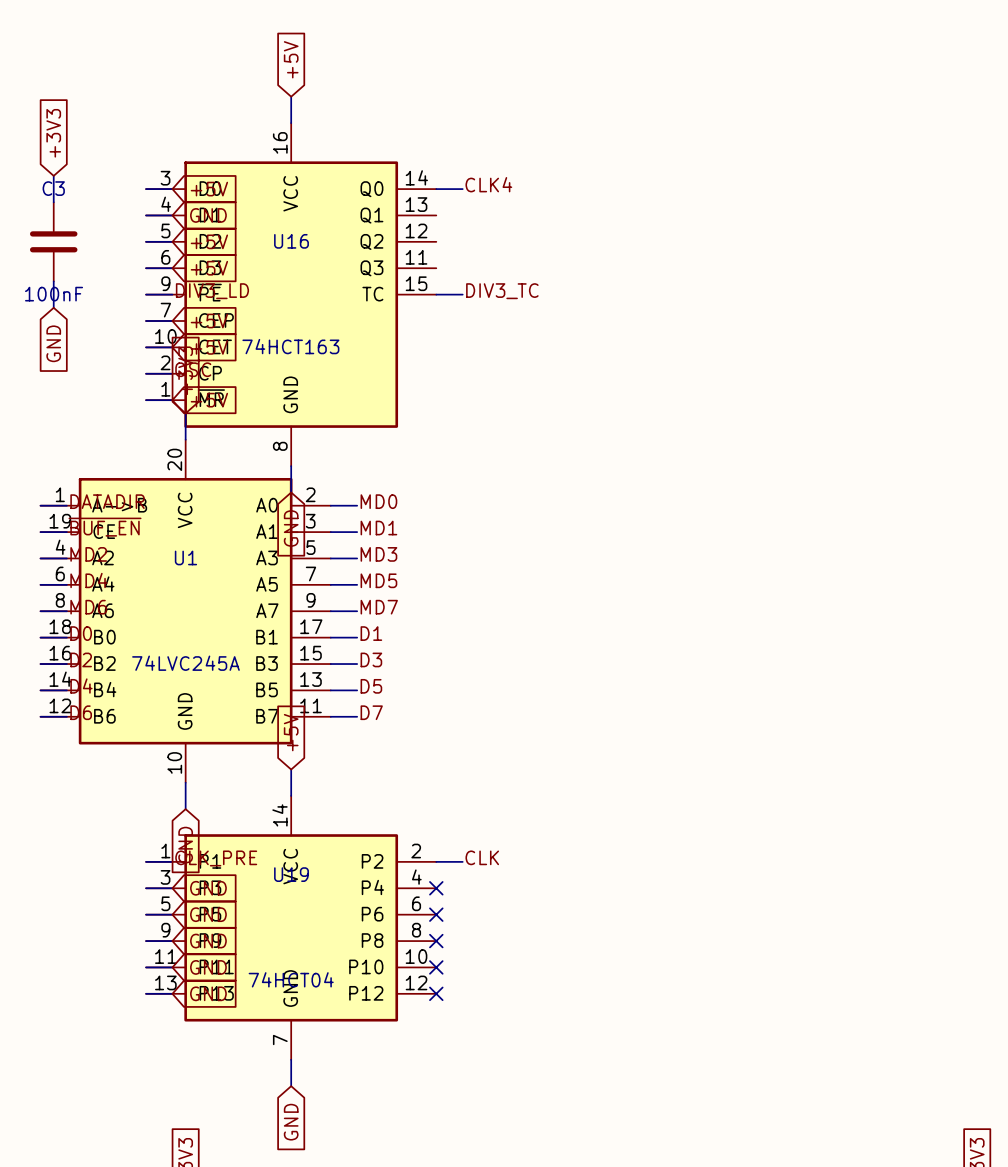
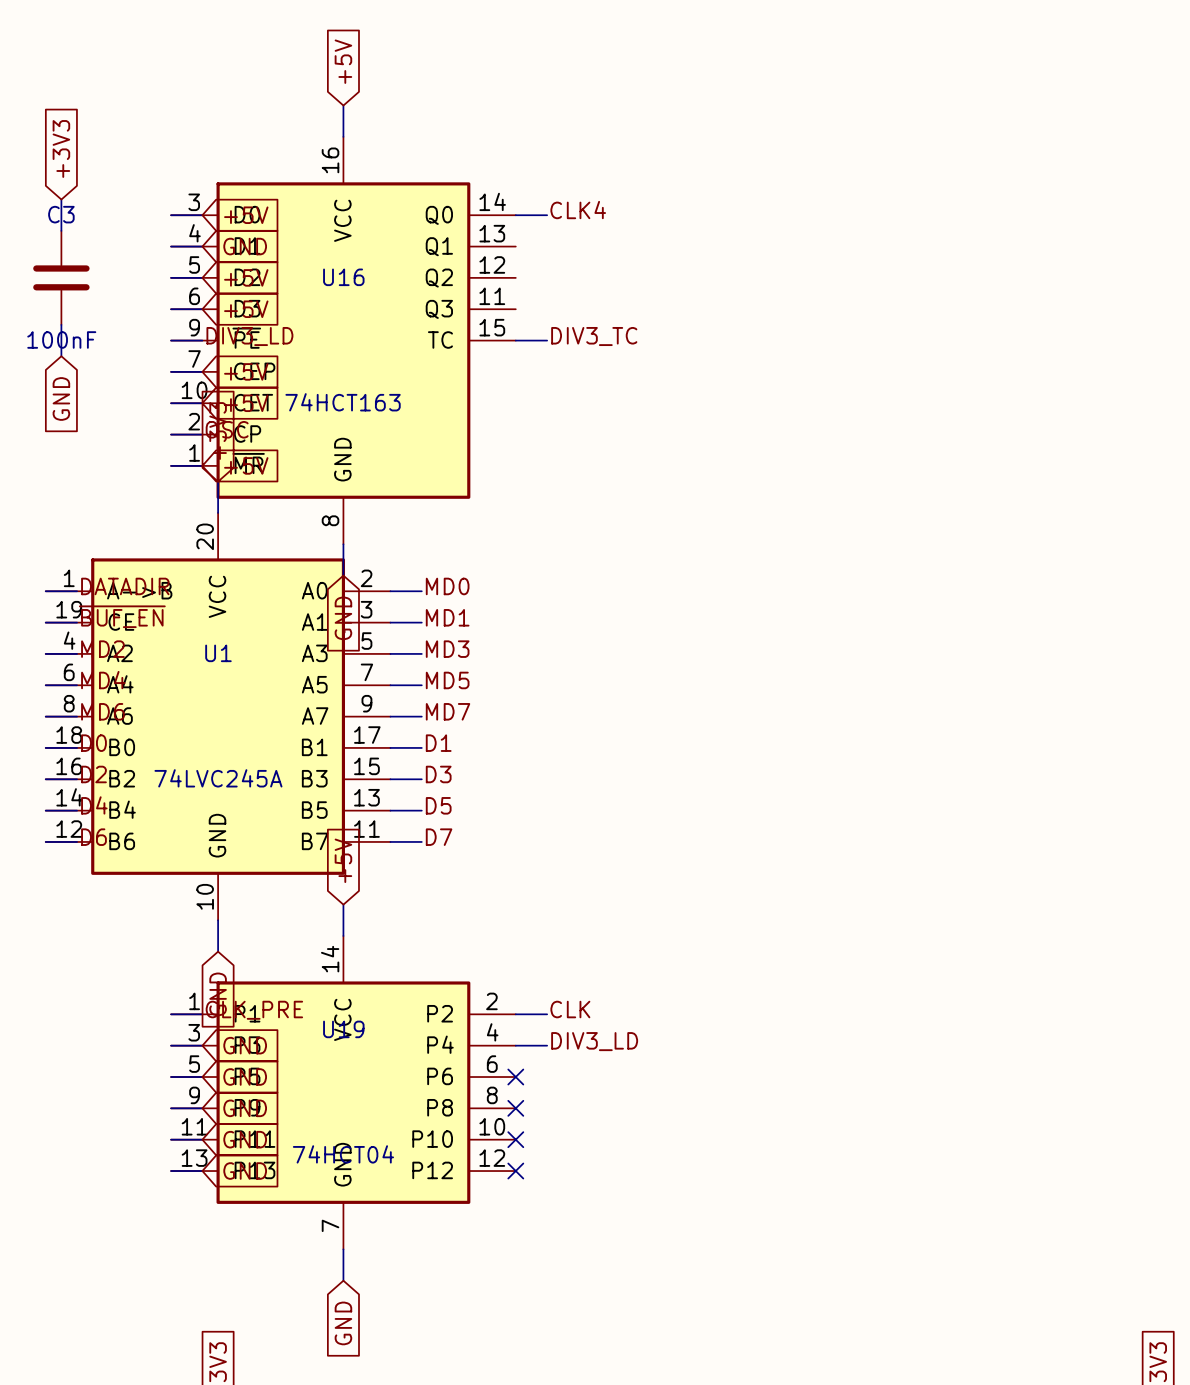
label: none -> DIV3_LD (594, 1041)
wire: none -> (515, 1045) (547, 1045)
no-connect mark: (436, 888) -> none

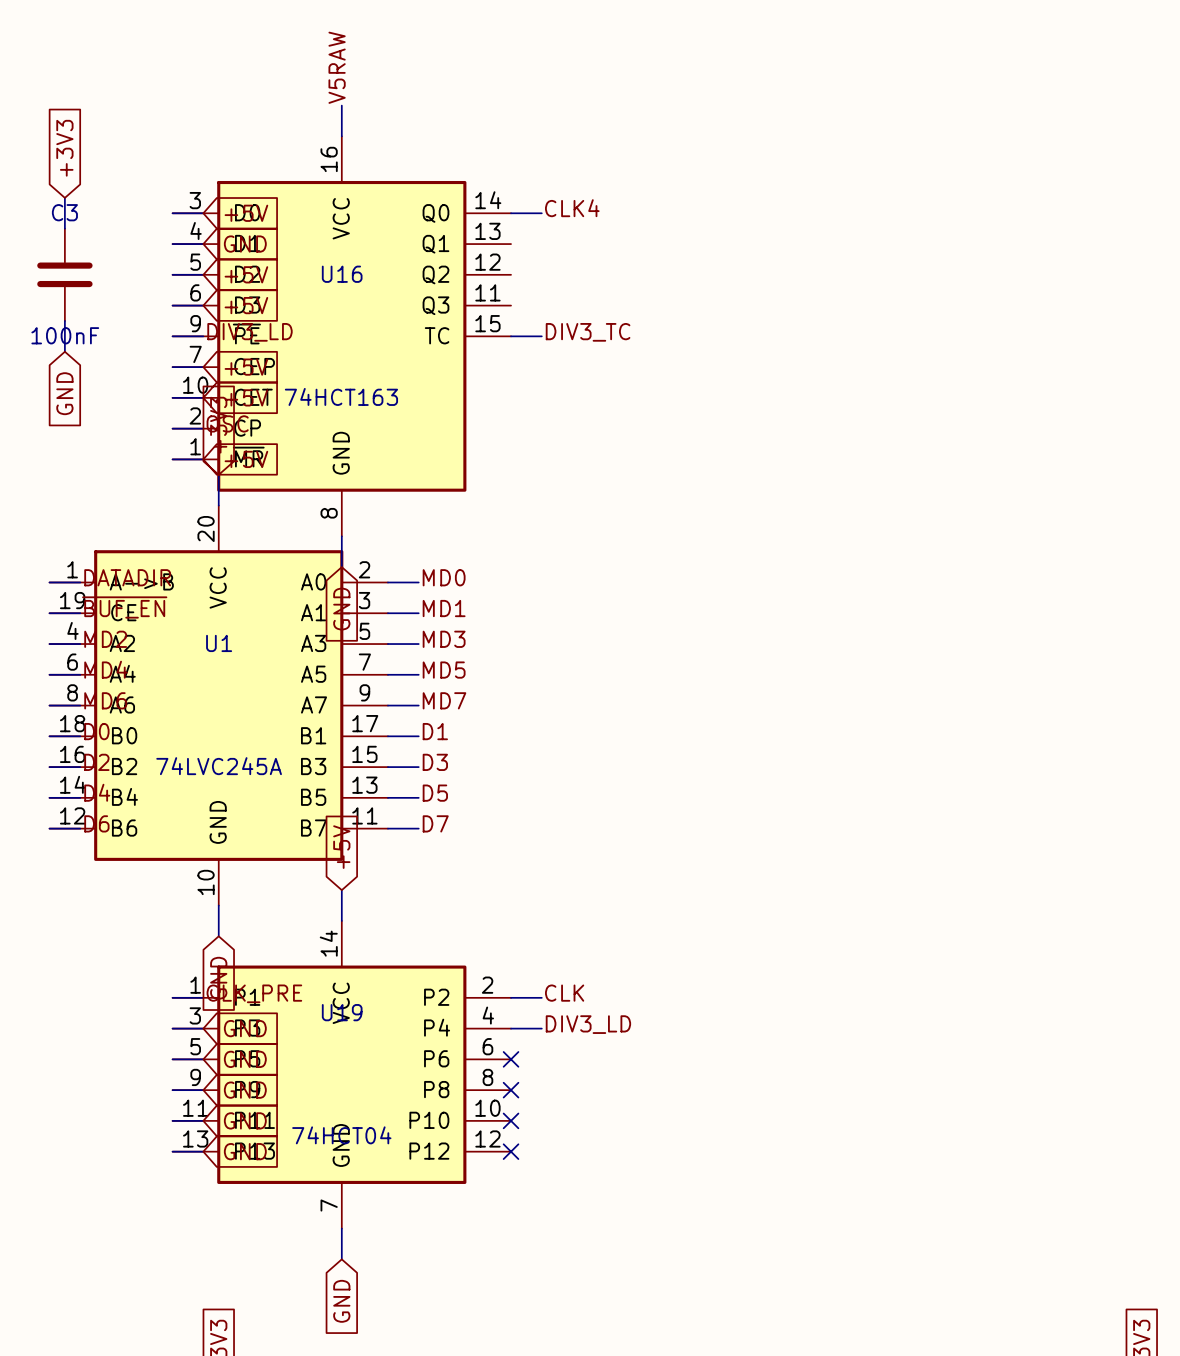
global label: +5V (343, 61) -> none
label: none -> V5RAW (337, 67)

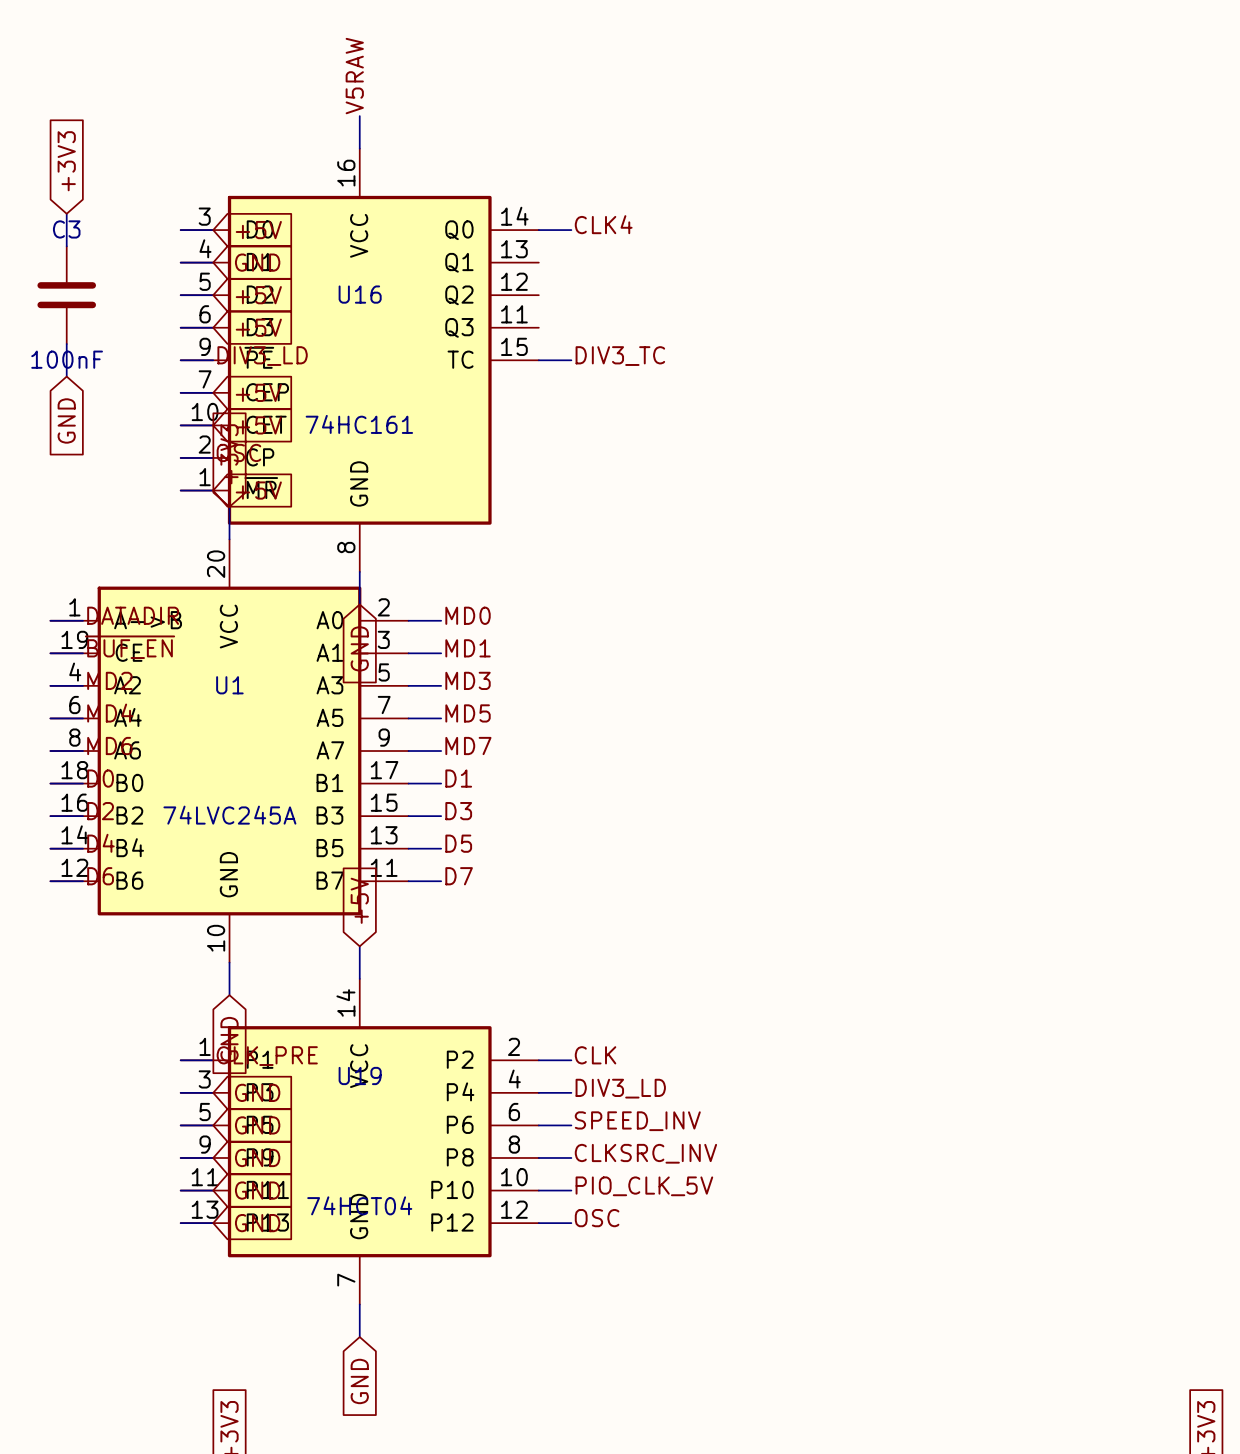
U16 value: 74HCT163 (341, 396) -> 74HC161 (359, 424)
label: none -> SPEED_INV (637, 1121)
wire: none -> (538, 1125) (571, 1125)
no-connect mark: (511, 1059) -> none
label: none -> CLKSRC_INV (645, 1153)
wire: none -> (538, 1157) (571, 1157)
no-connect mark: (511, 1090) -> none
label: none -> PIO_CLK_5V (644, 1186)
wire: none -> (538, 1190) (571, 1190)
no-connect mark: (511, 1120) -> none
label: none -> OSC (597, 1218)
wire: none -> (538, 1223) (571, 1223)
no-connect mark: (511, 1151) -> none

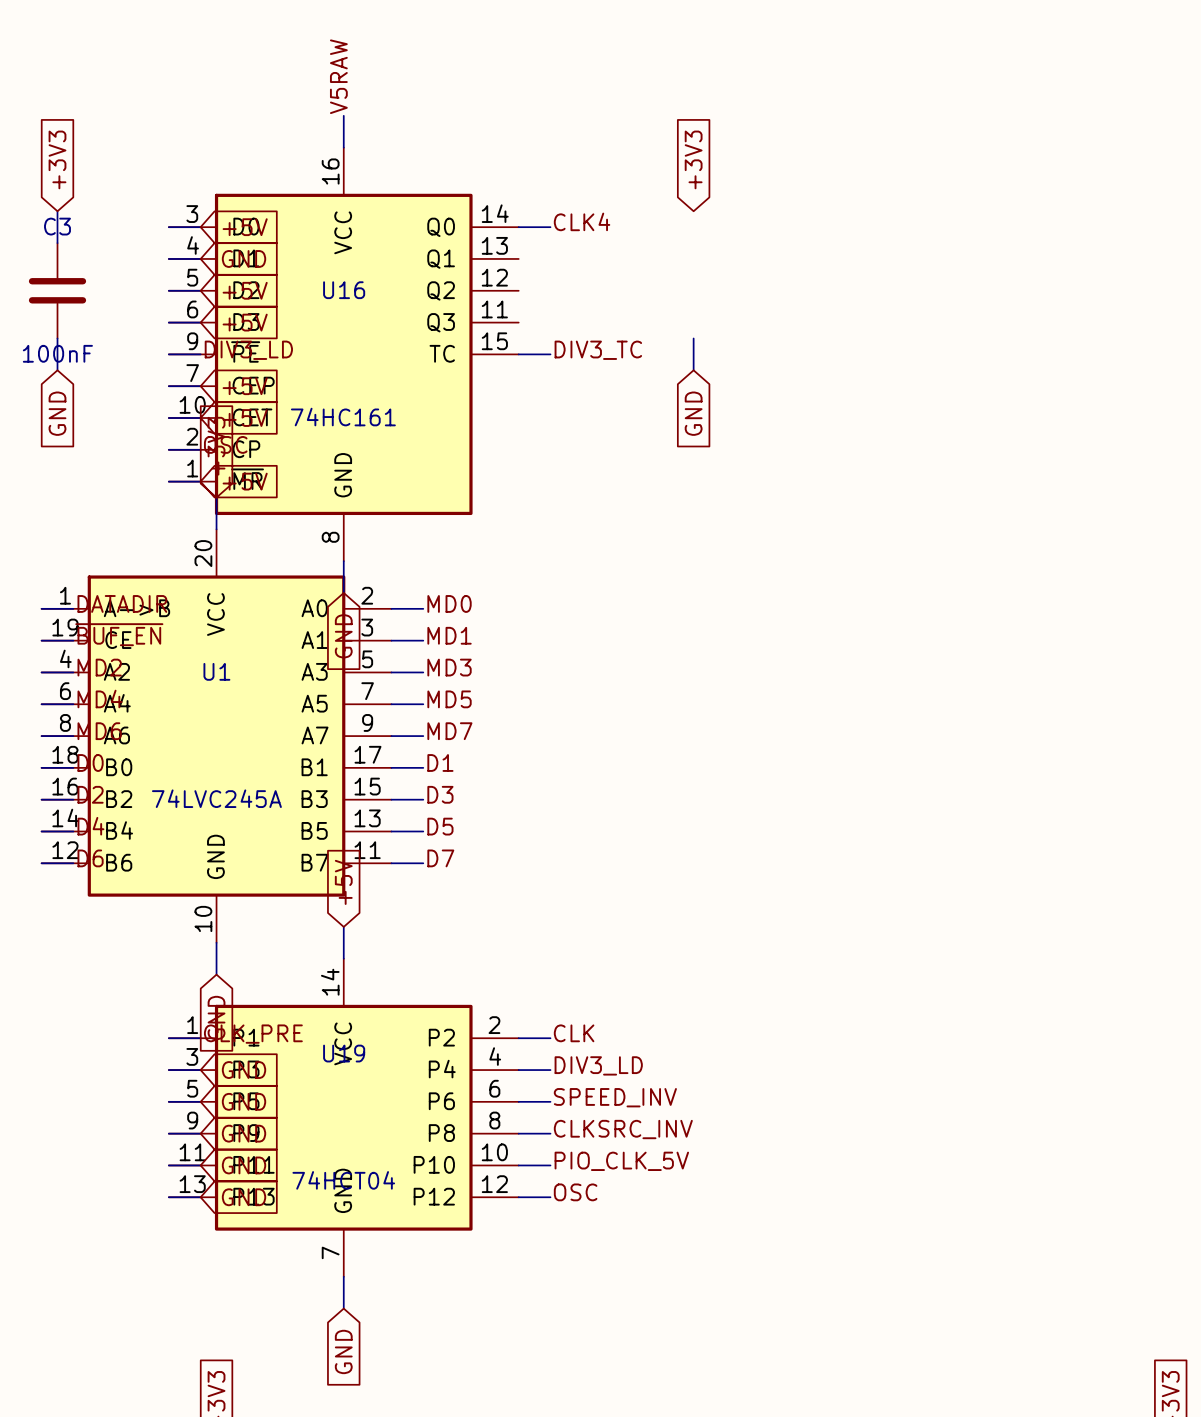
global label: none -> +3V3 (693, 159)
wire: none -> (693, 338) (693, 370)
global label: none -> GND (693, 413)

